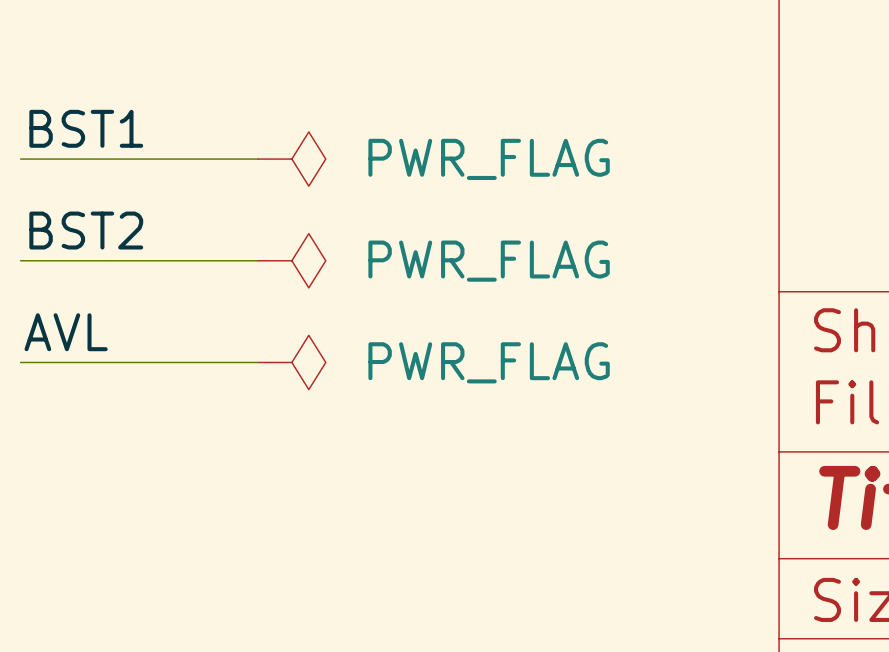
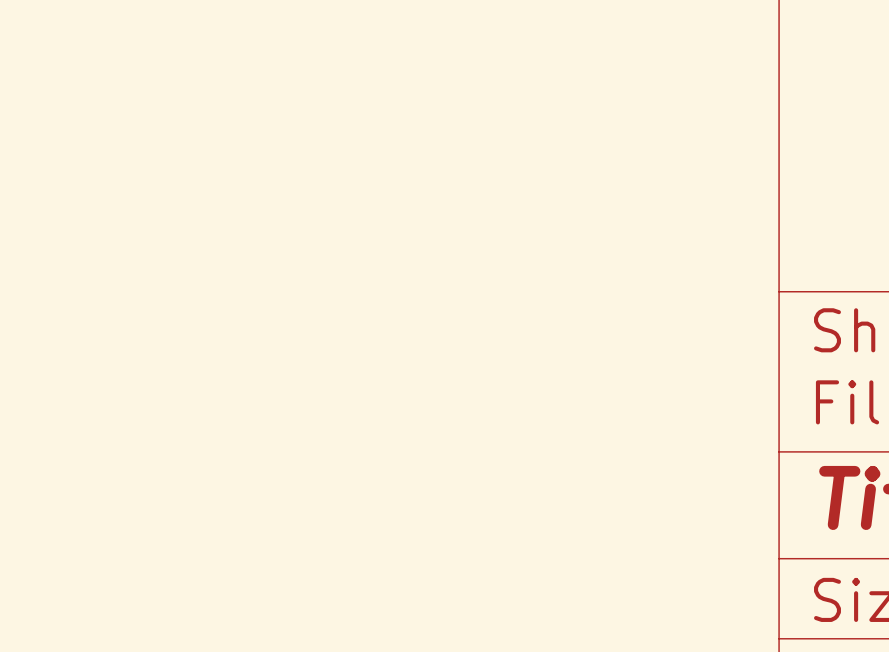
label: BST1 (86, 128) -> none
wire: (20, 159) (257, 159) -> none
power symbol: PWR_FLAG (291, 159) -> none
label: BST2 (86, 230) -> none
wire: (20, 260) (257, 260) -> none
power symbol: PWR_FLAG (291, 260) -> none
label: AVL (66, 332) -> none
wire: (20, 362) (257, 362) -> none
power symbol: PWR_FLAG (291, 362) -> none

